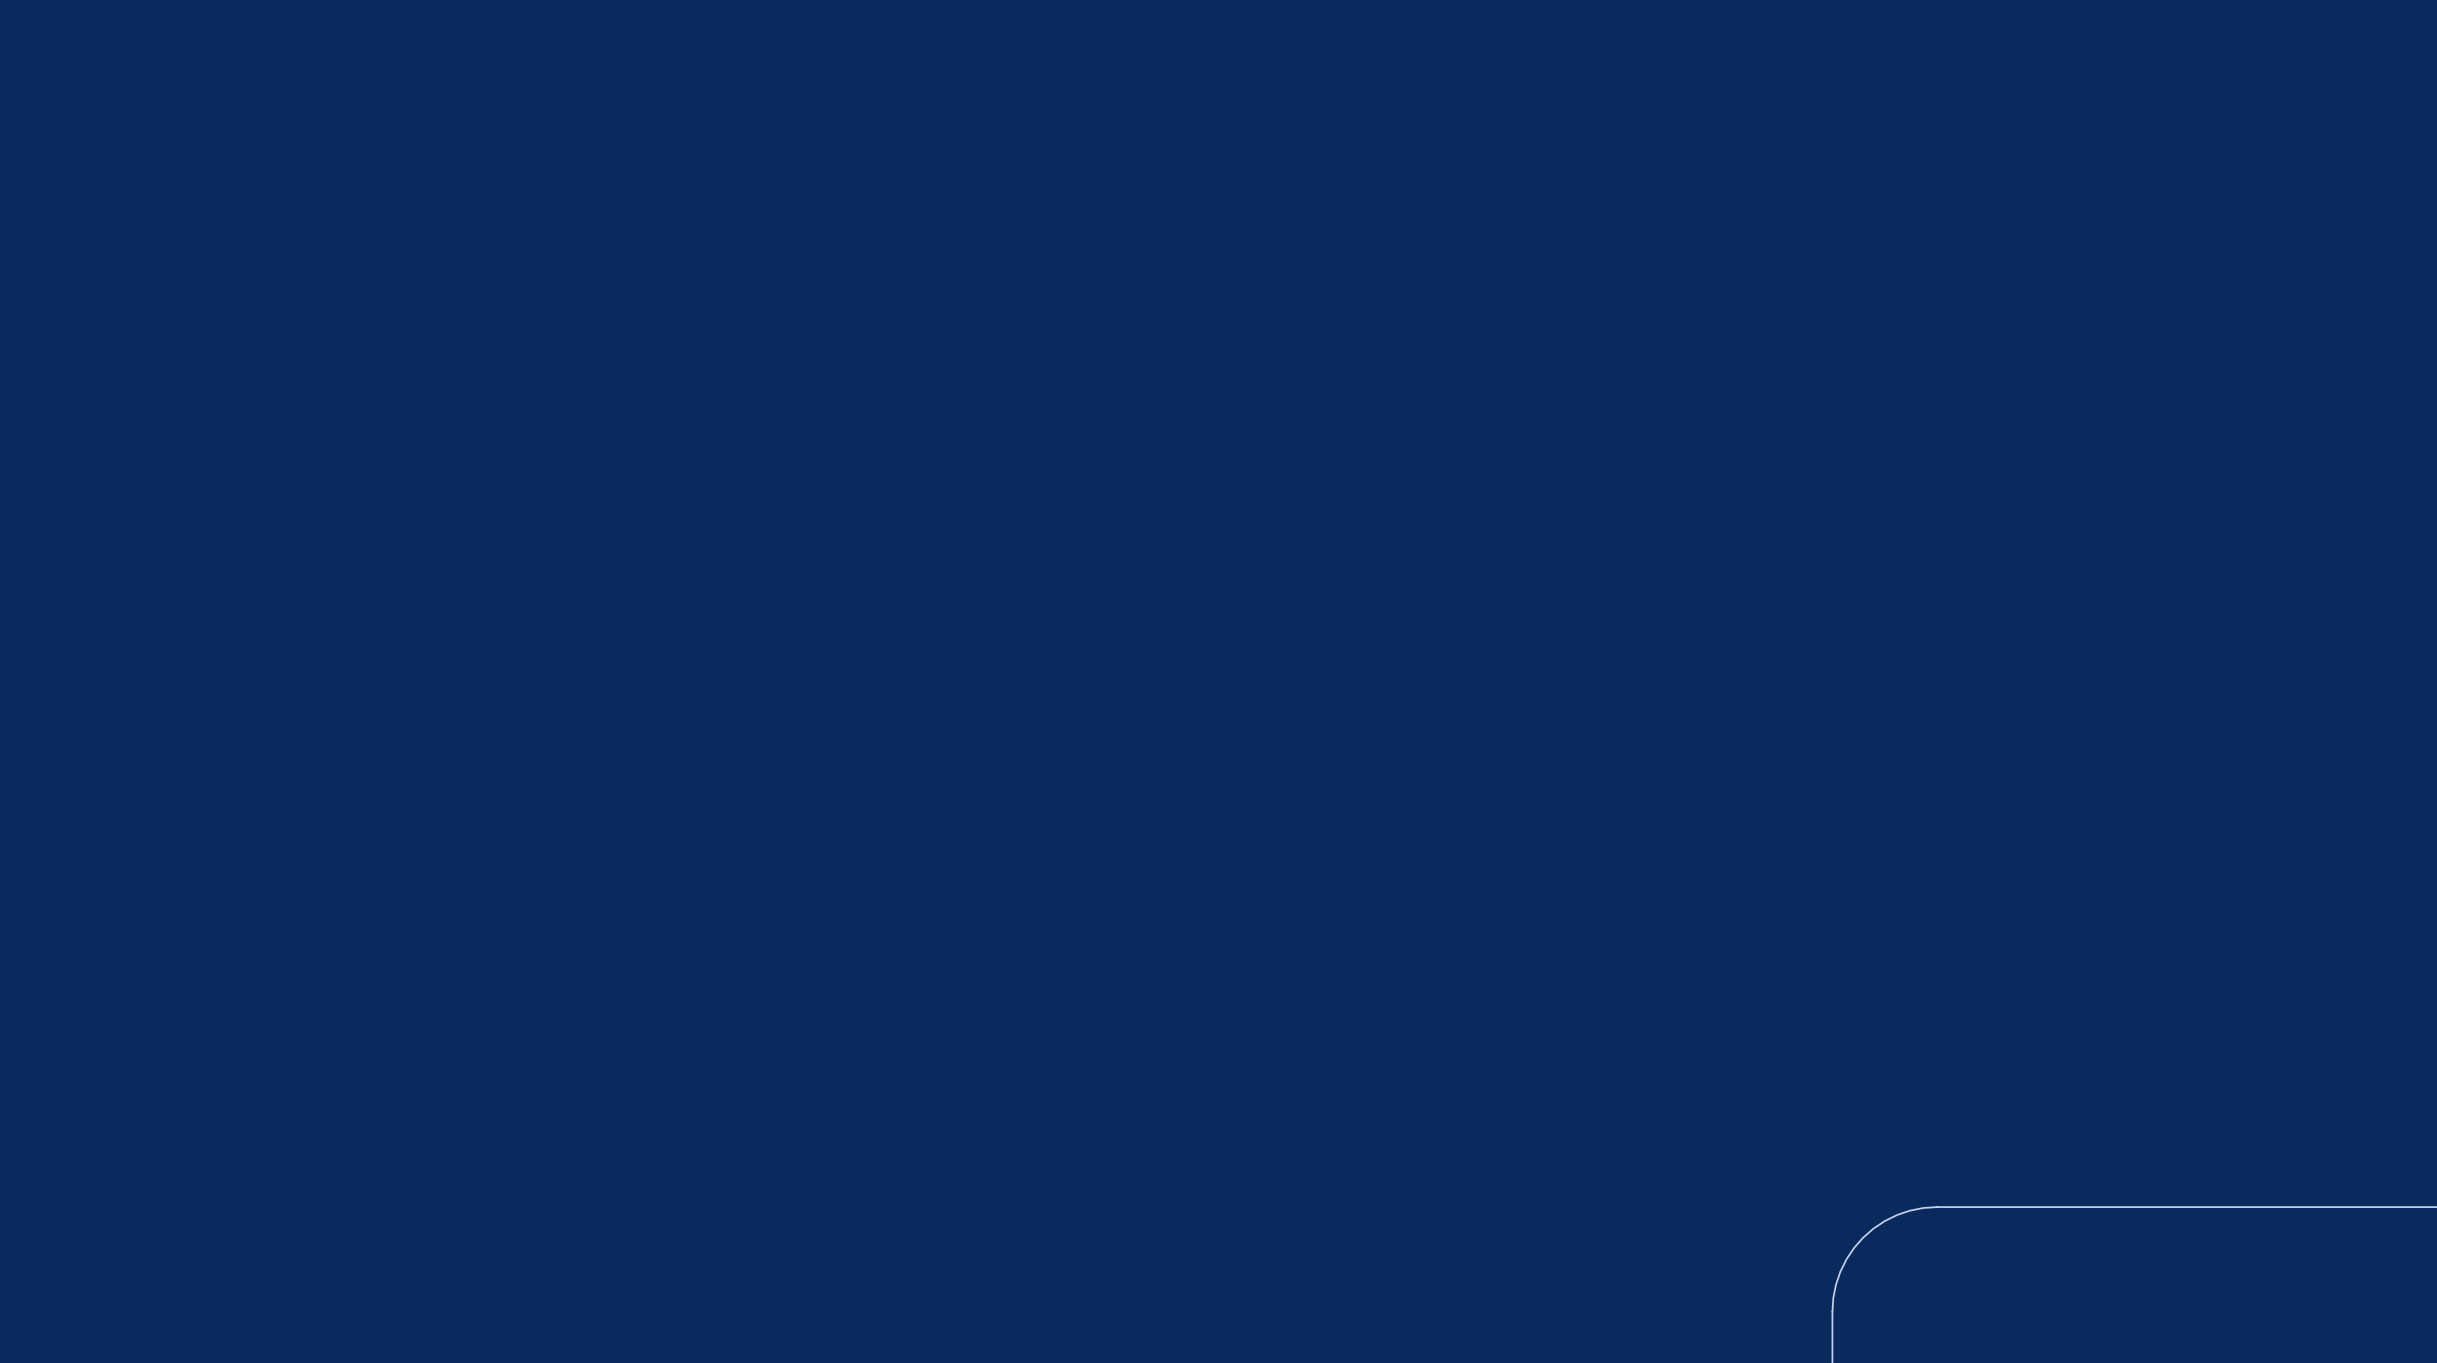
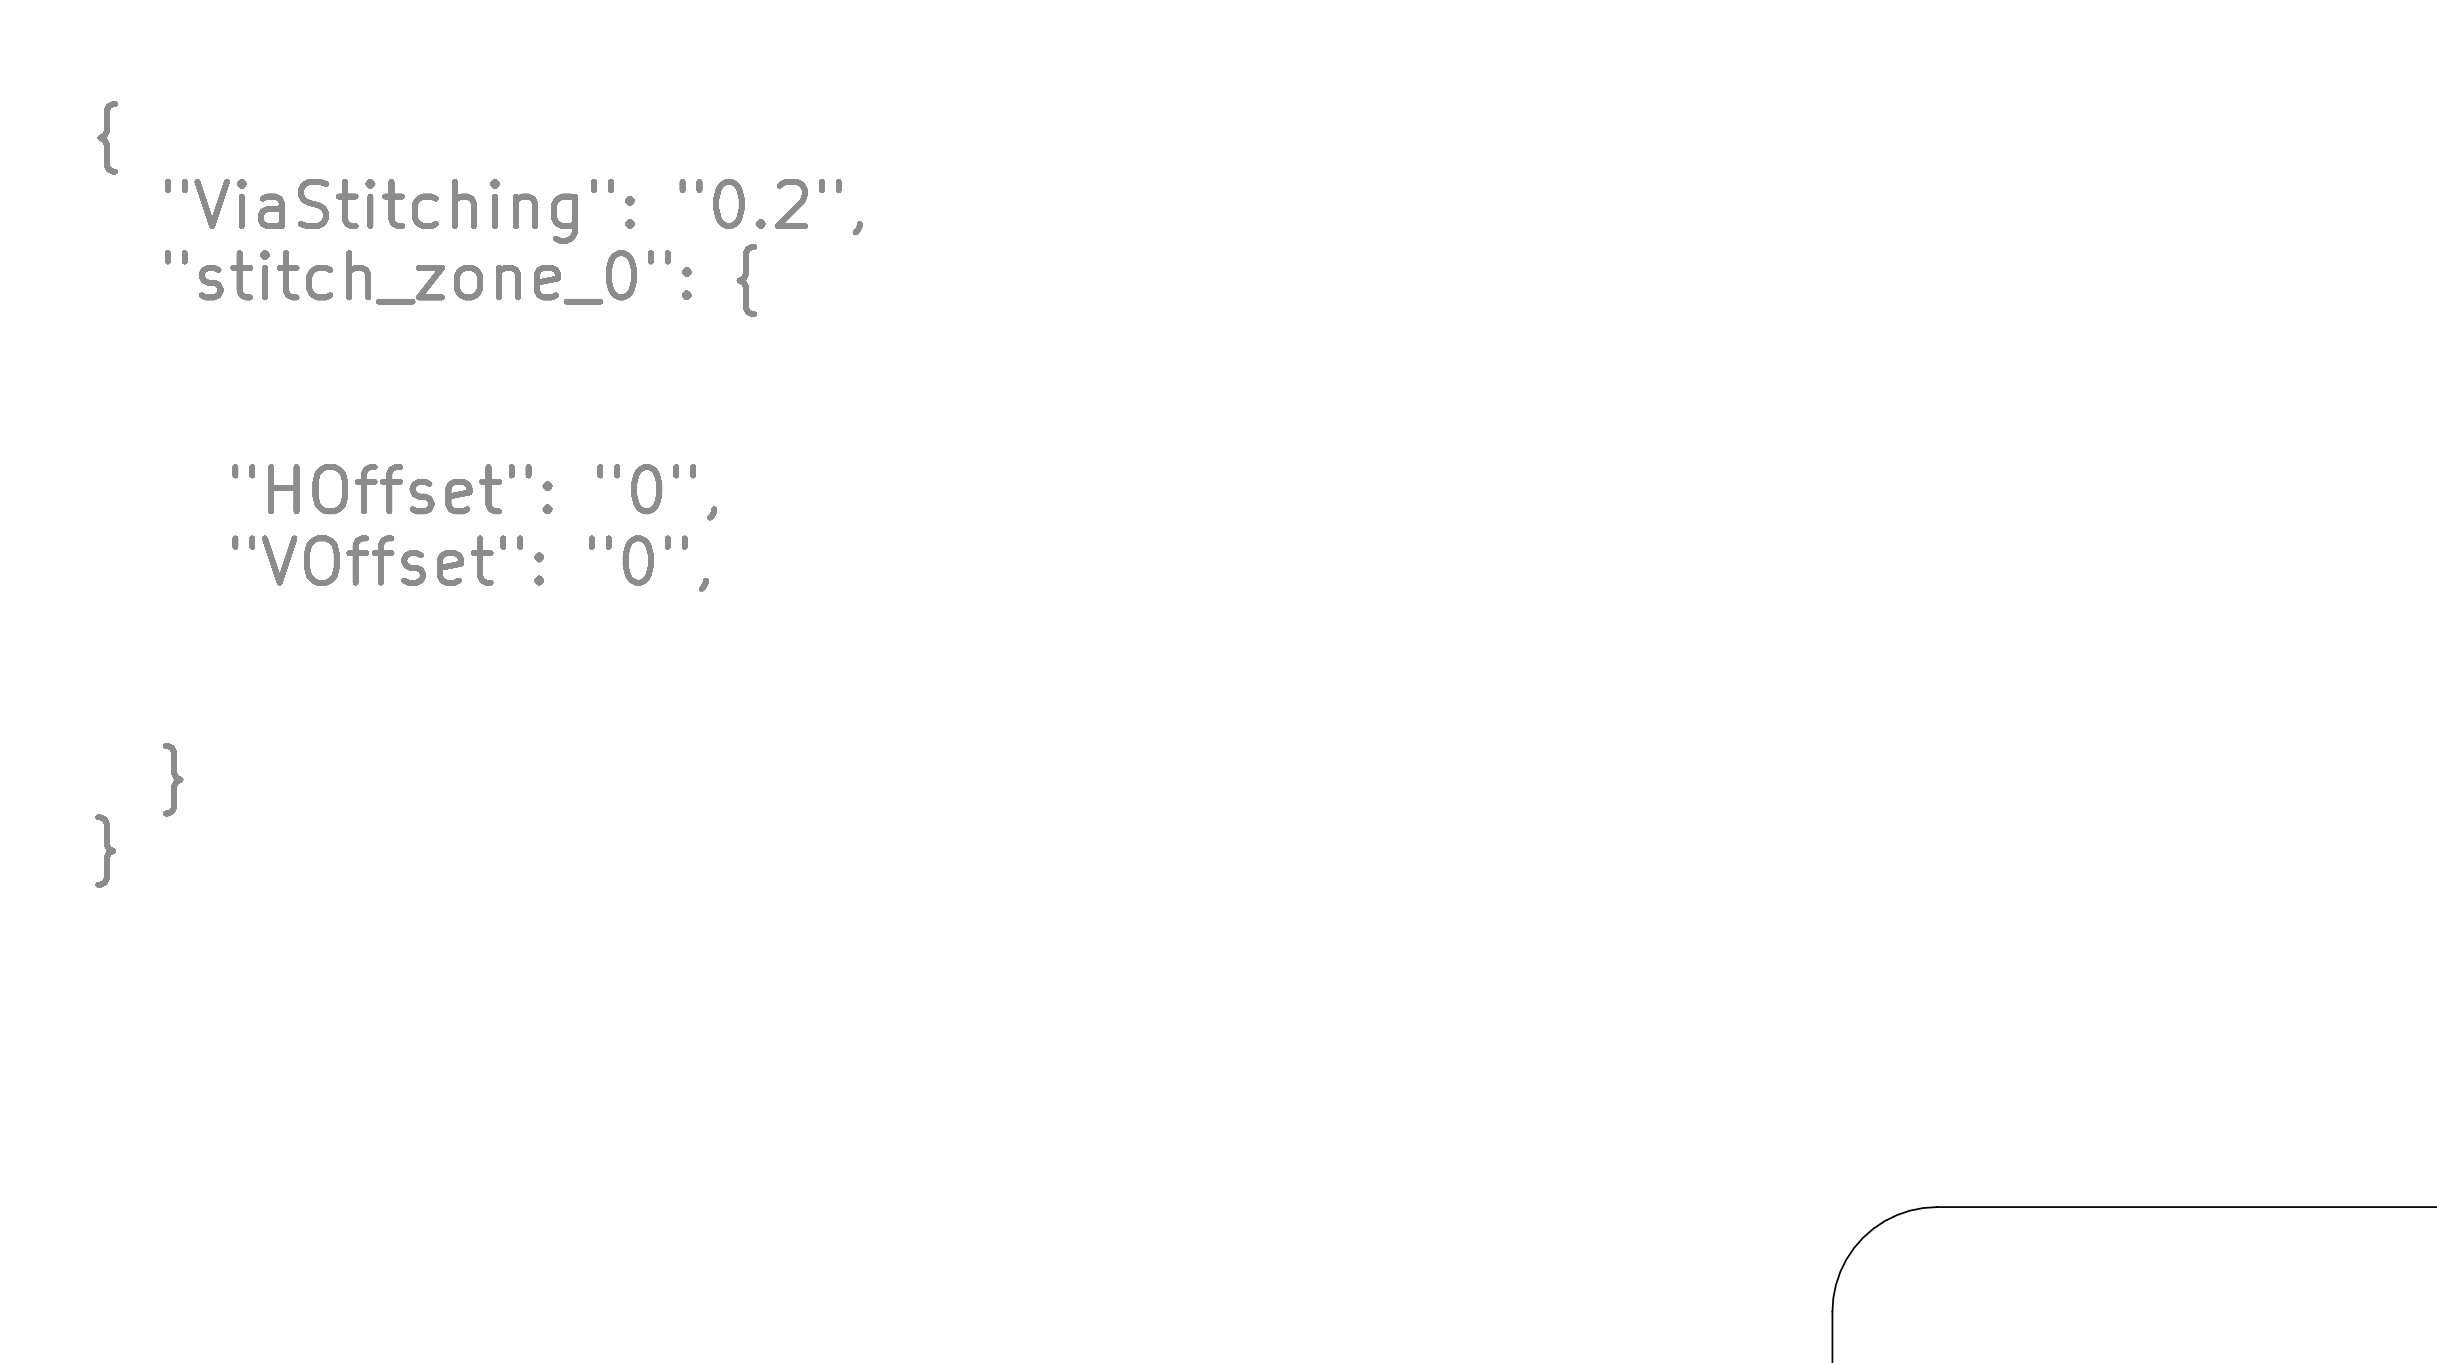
text: none -> { (107, 137)
text: none -> "ViaStitching": "0.2", (513, 211)
text: none -> "stitch_zone_0": { (461, 280)
text: none -> "HOffset": "0", (474, 492)
text: none -> "VOffset": "0", (470, 563)
text: none -> } (173, 779)
text: none -> } (105, 851)

